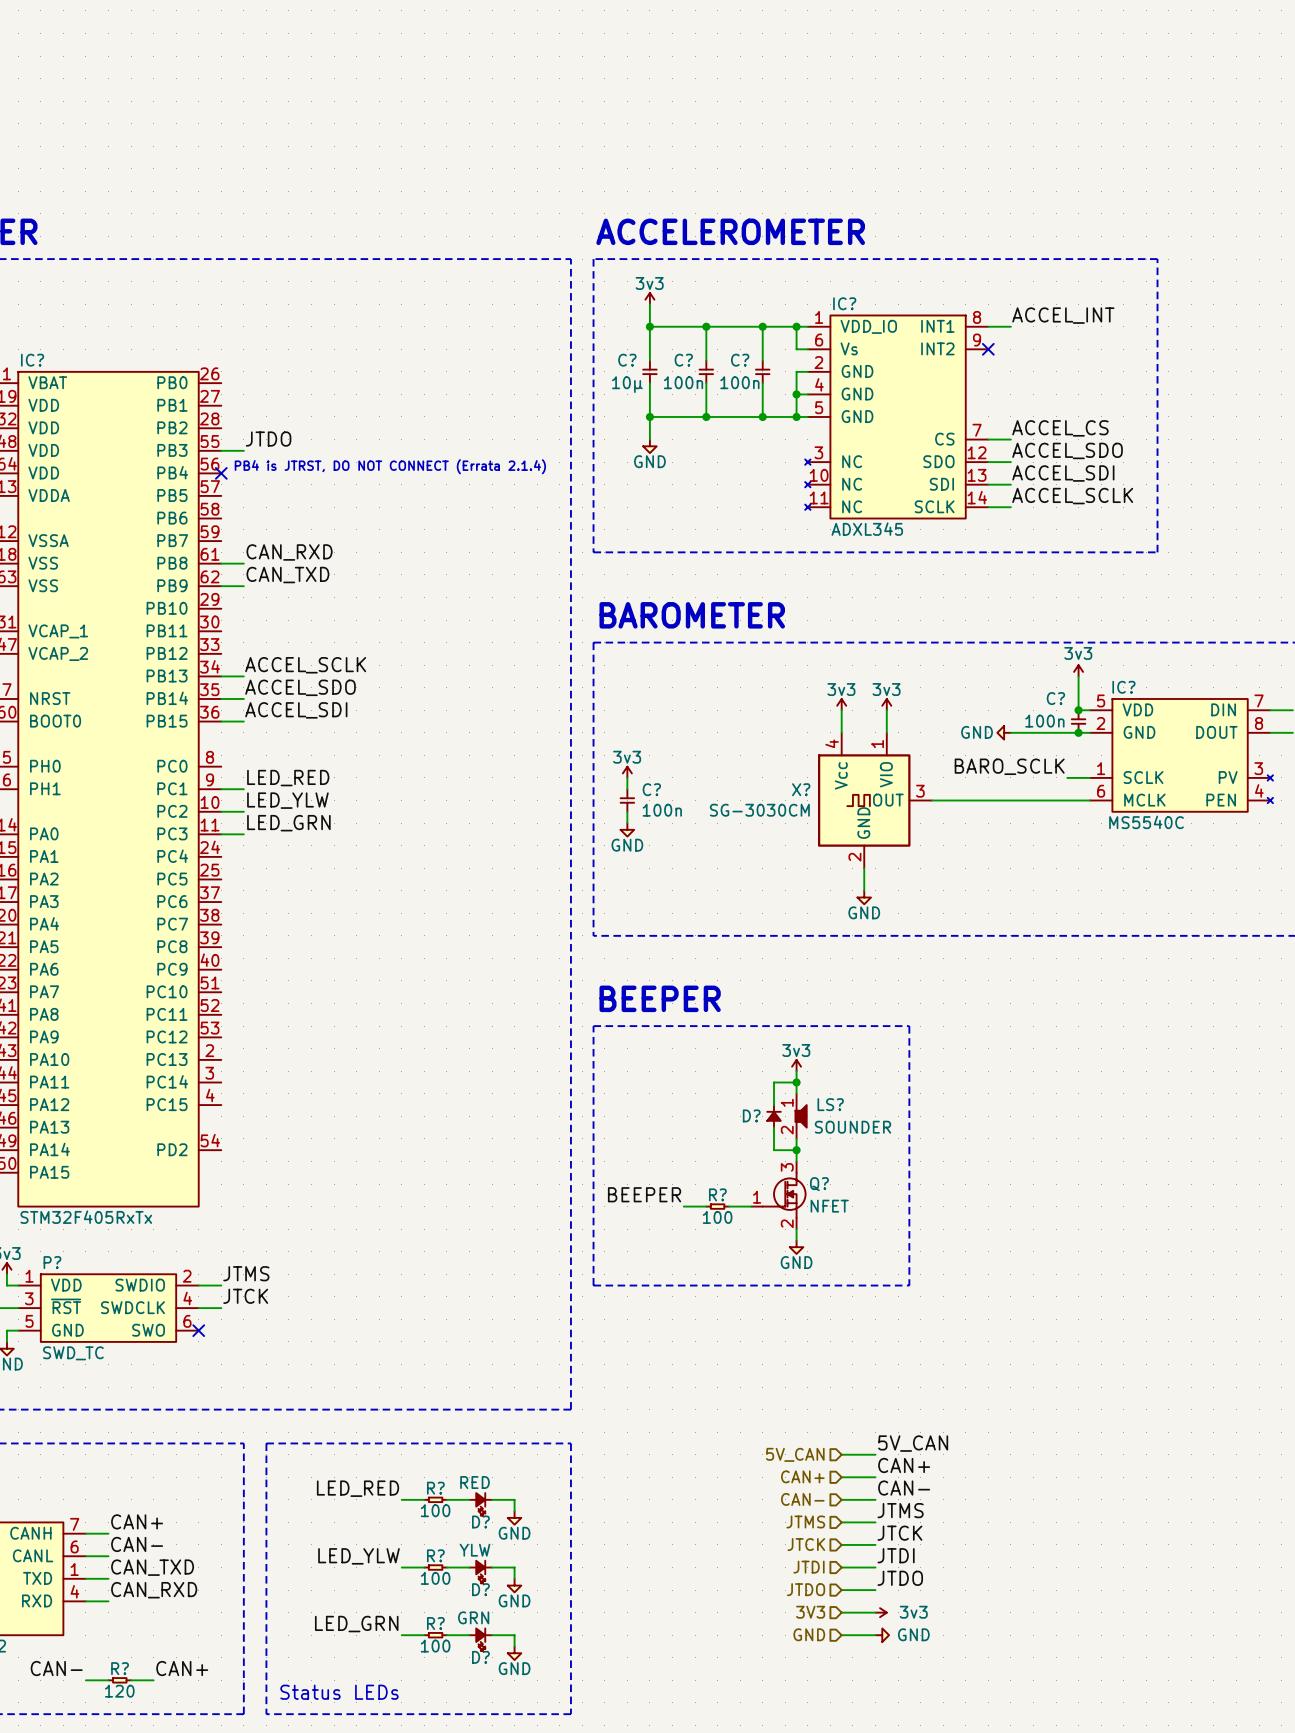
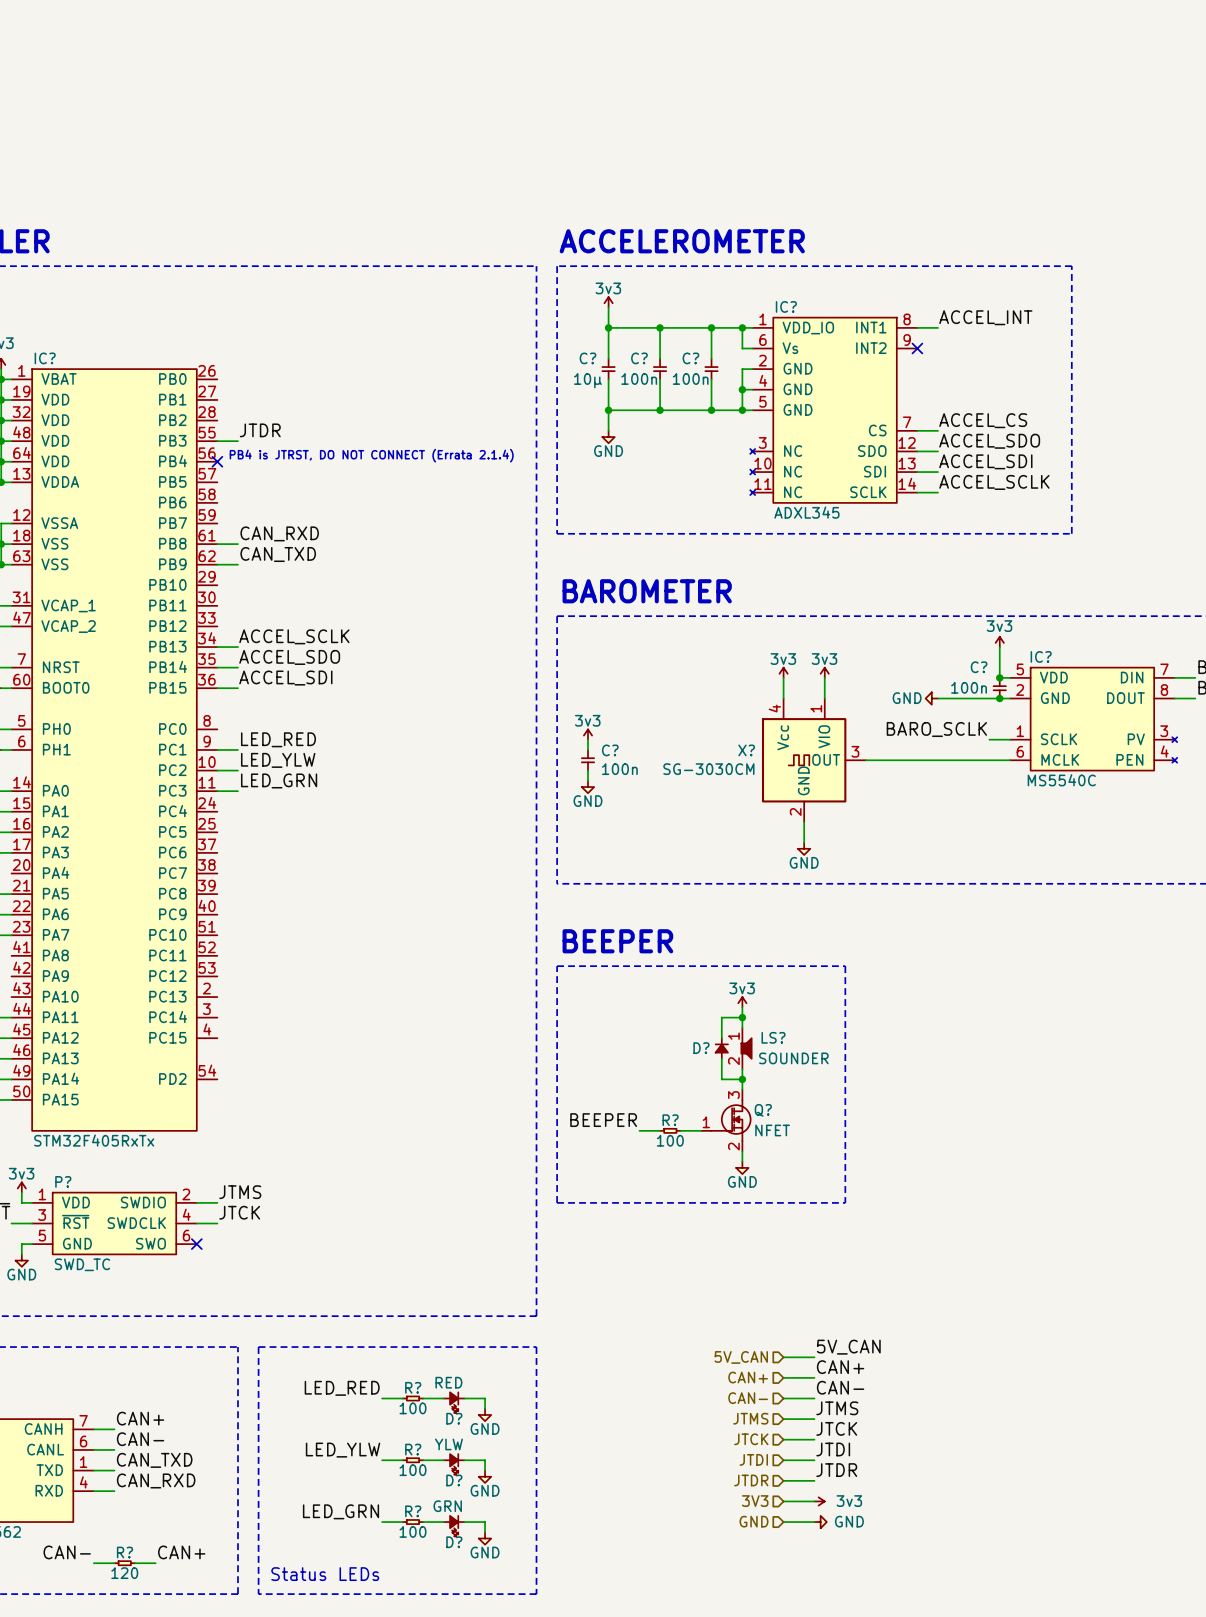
label: JTDO (268, 439) -> JTDR (260, 430)
label: JTDO (900, 1578) -> JTDR (836, 1470)
hierarchical label: JTDO (806, 1589) -> JTDR (751, 1480)

